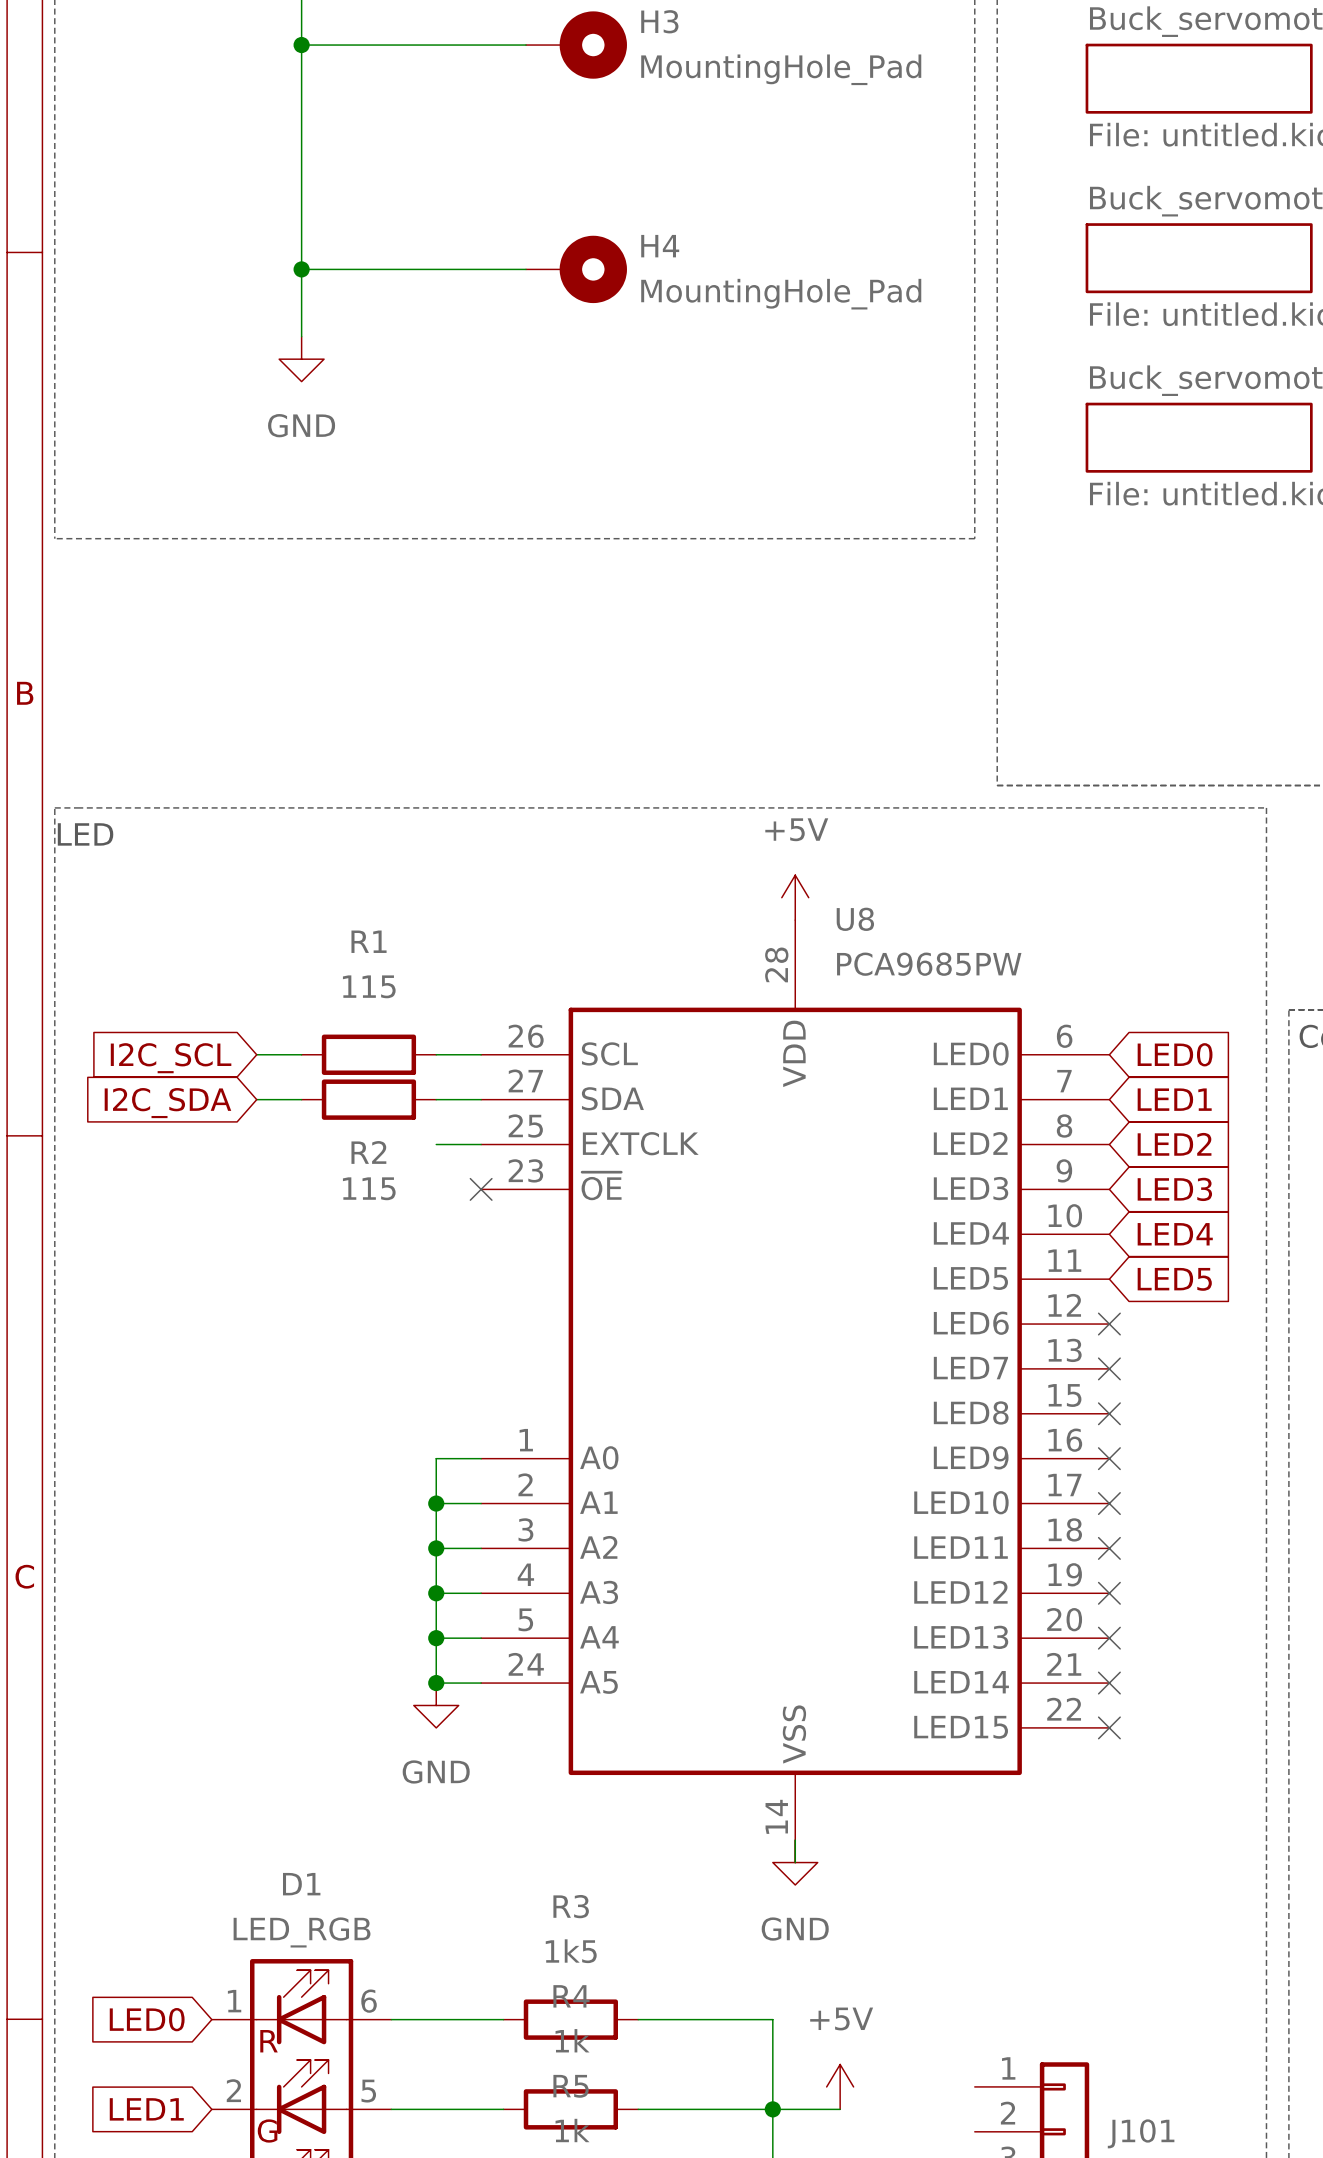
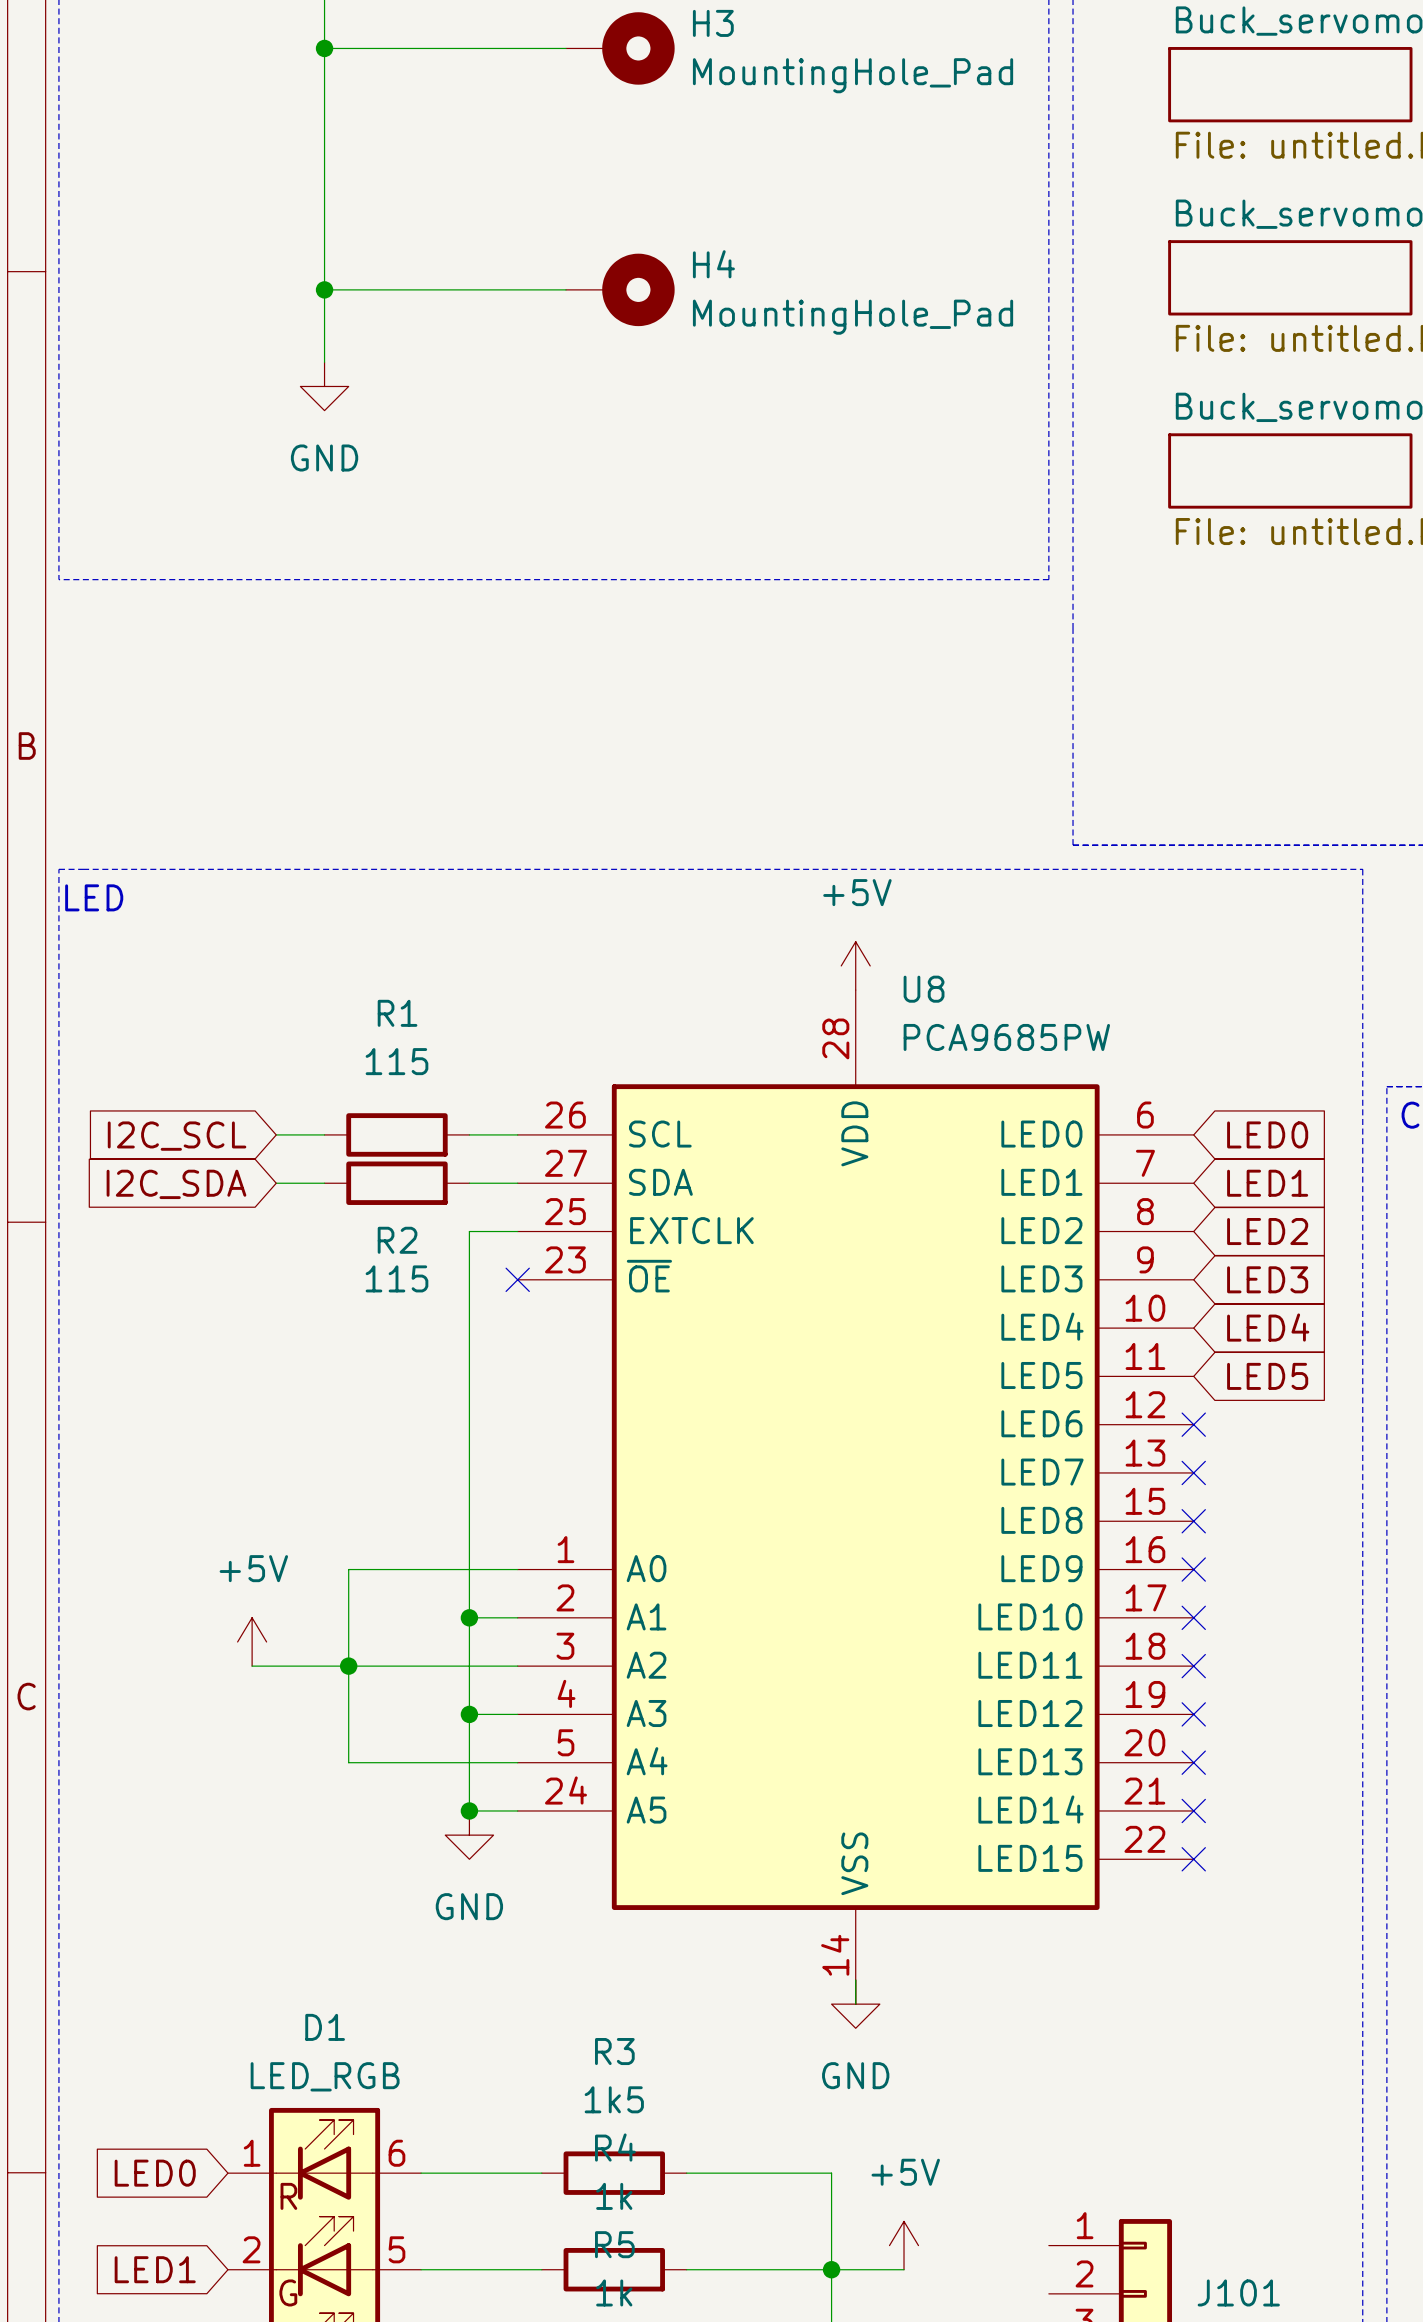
wire: none -> (469, 1231) (469, 1569) (348, 1569) (348, 1762) (469, 1762)
power symbol: none -> +5V (252, 1641)
wire: none -> (252, 1666) (469, 1666)
junction: none -> (348, 1666)
junction: (436, 1548) -> none
junction: (436, 1638) -> none

